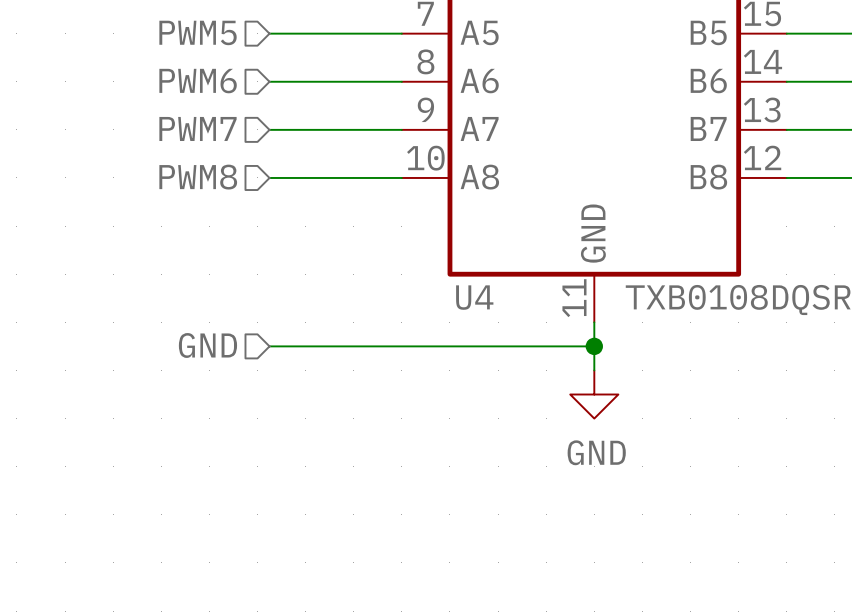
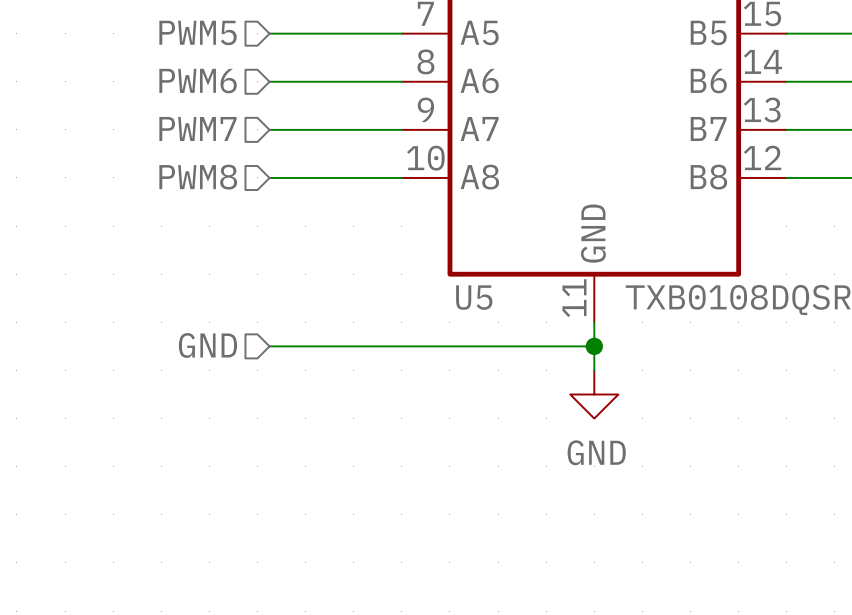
U4 name: U4 (474, 297) -> U5 (474, 297)

